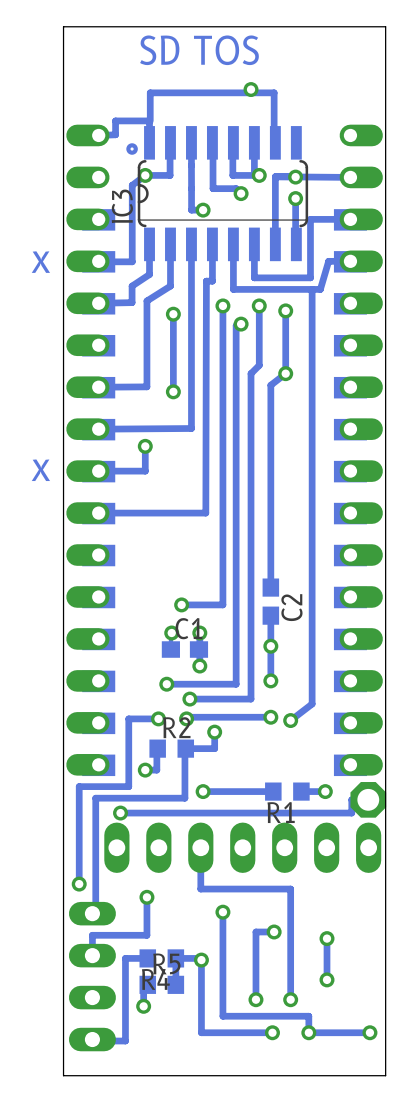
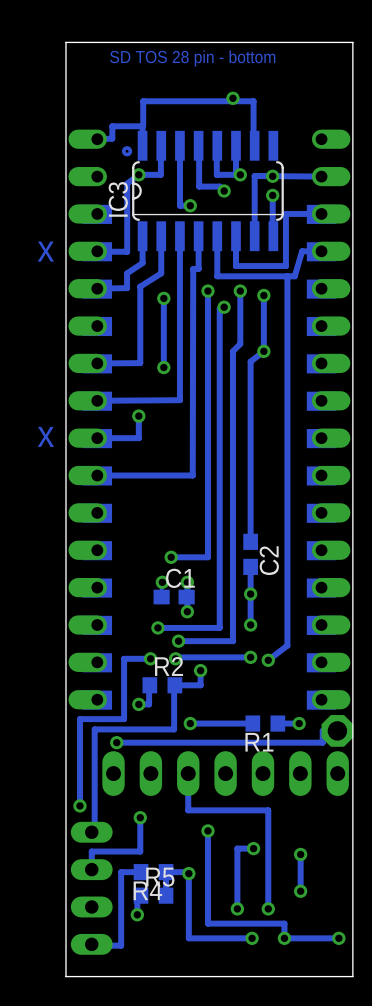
text: none -> SD TOS 28 pin - bottom (192, 58)
text: SD TOS (199, 50) -> none

